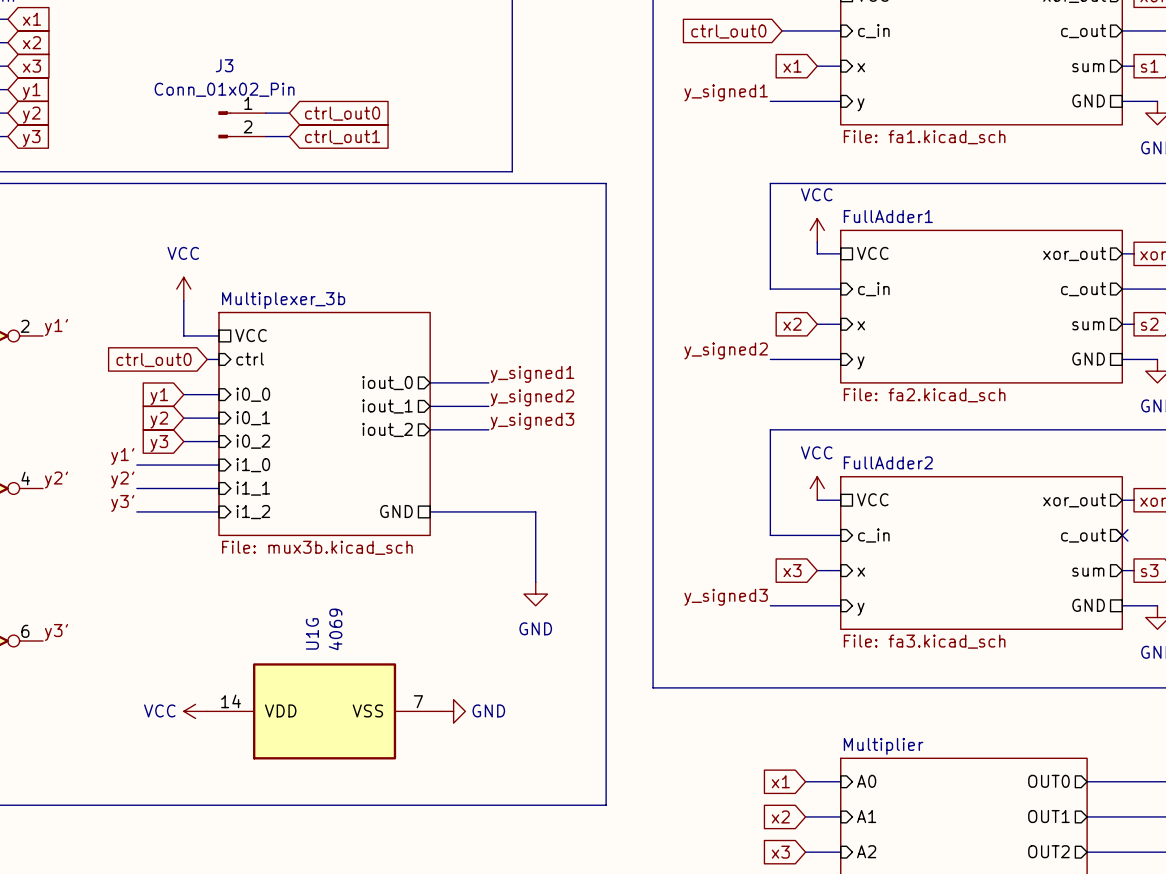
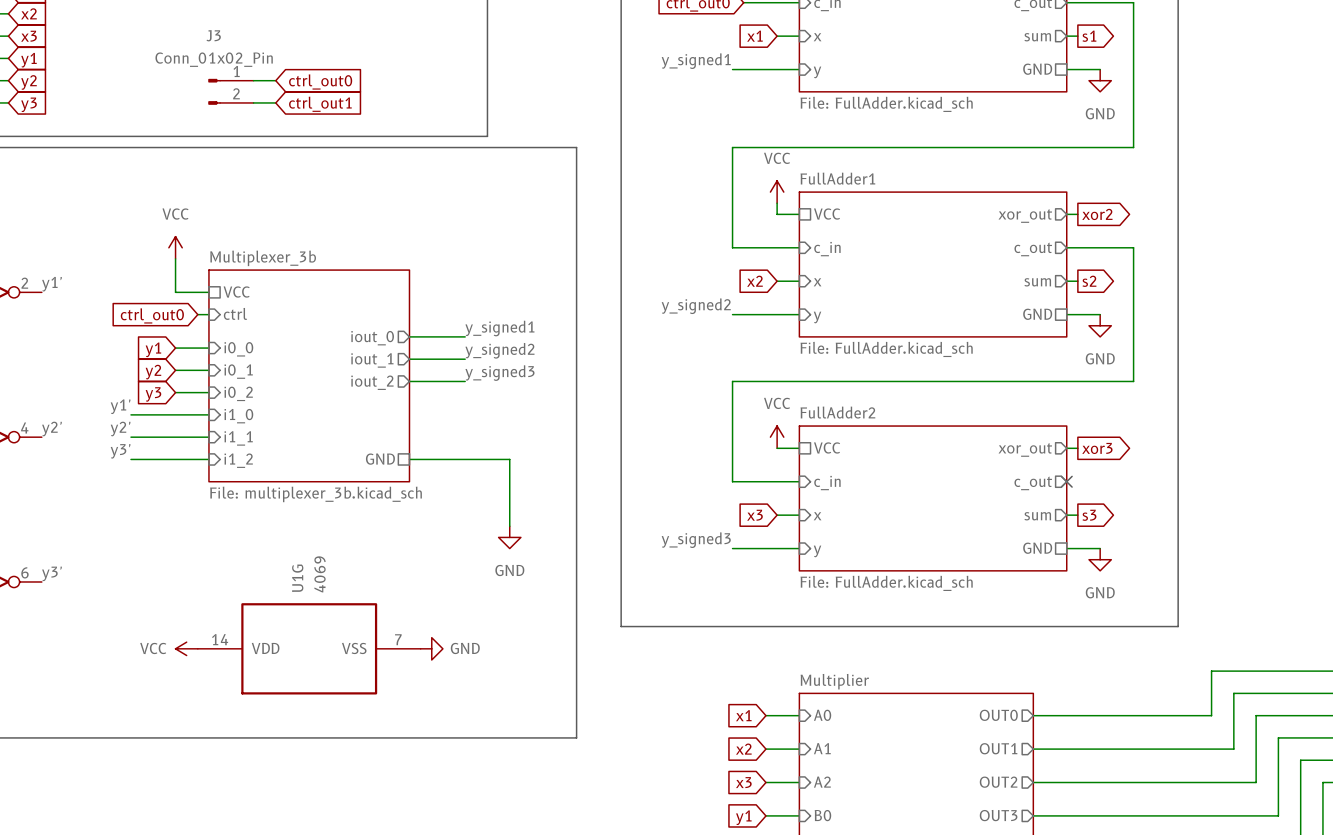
sheet value: File: fa1.kicad_sch (924, 137) -> File: FullAdder.kicad_sch (886, 104)
sheet FullAdder1 value: File: fa2.kicad_sch (924, 395) -> File: FullAdder.kicad_sch (886, 349)
sheet Multiplexer_3b value: File: mux3b.kicad_sch (317, 547) -> File: multiplexer_3b.kicad_sch (316, 494)
sheet FullAdder2 value: File: fa3.kicad_sch (924, 641) -> File: FullAdder.kicad_sch (886, 583)

